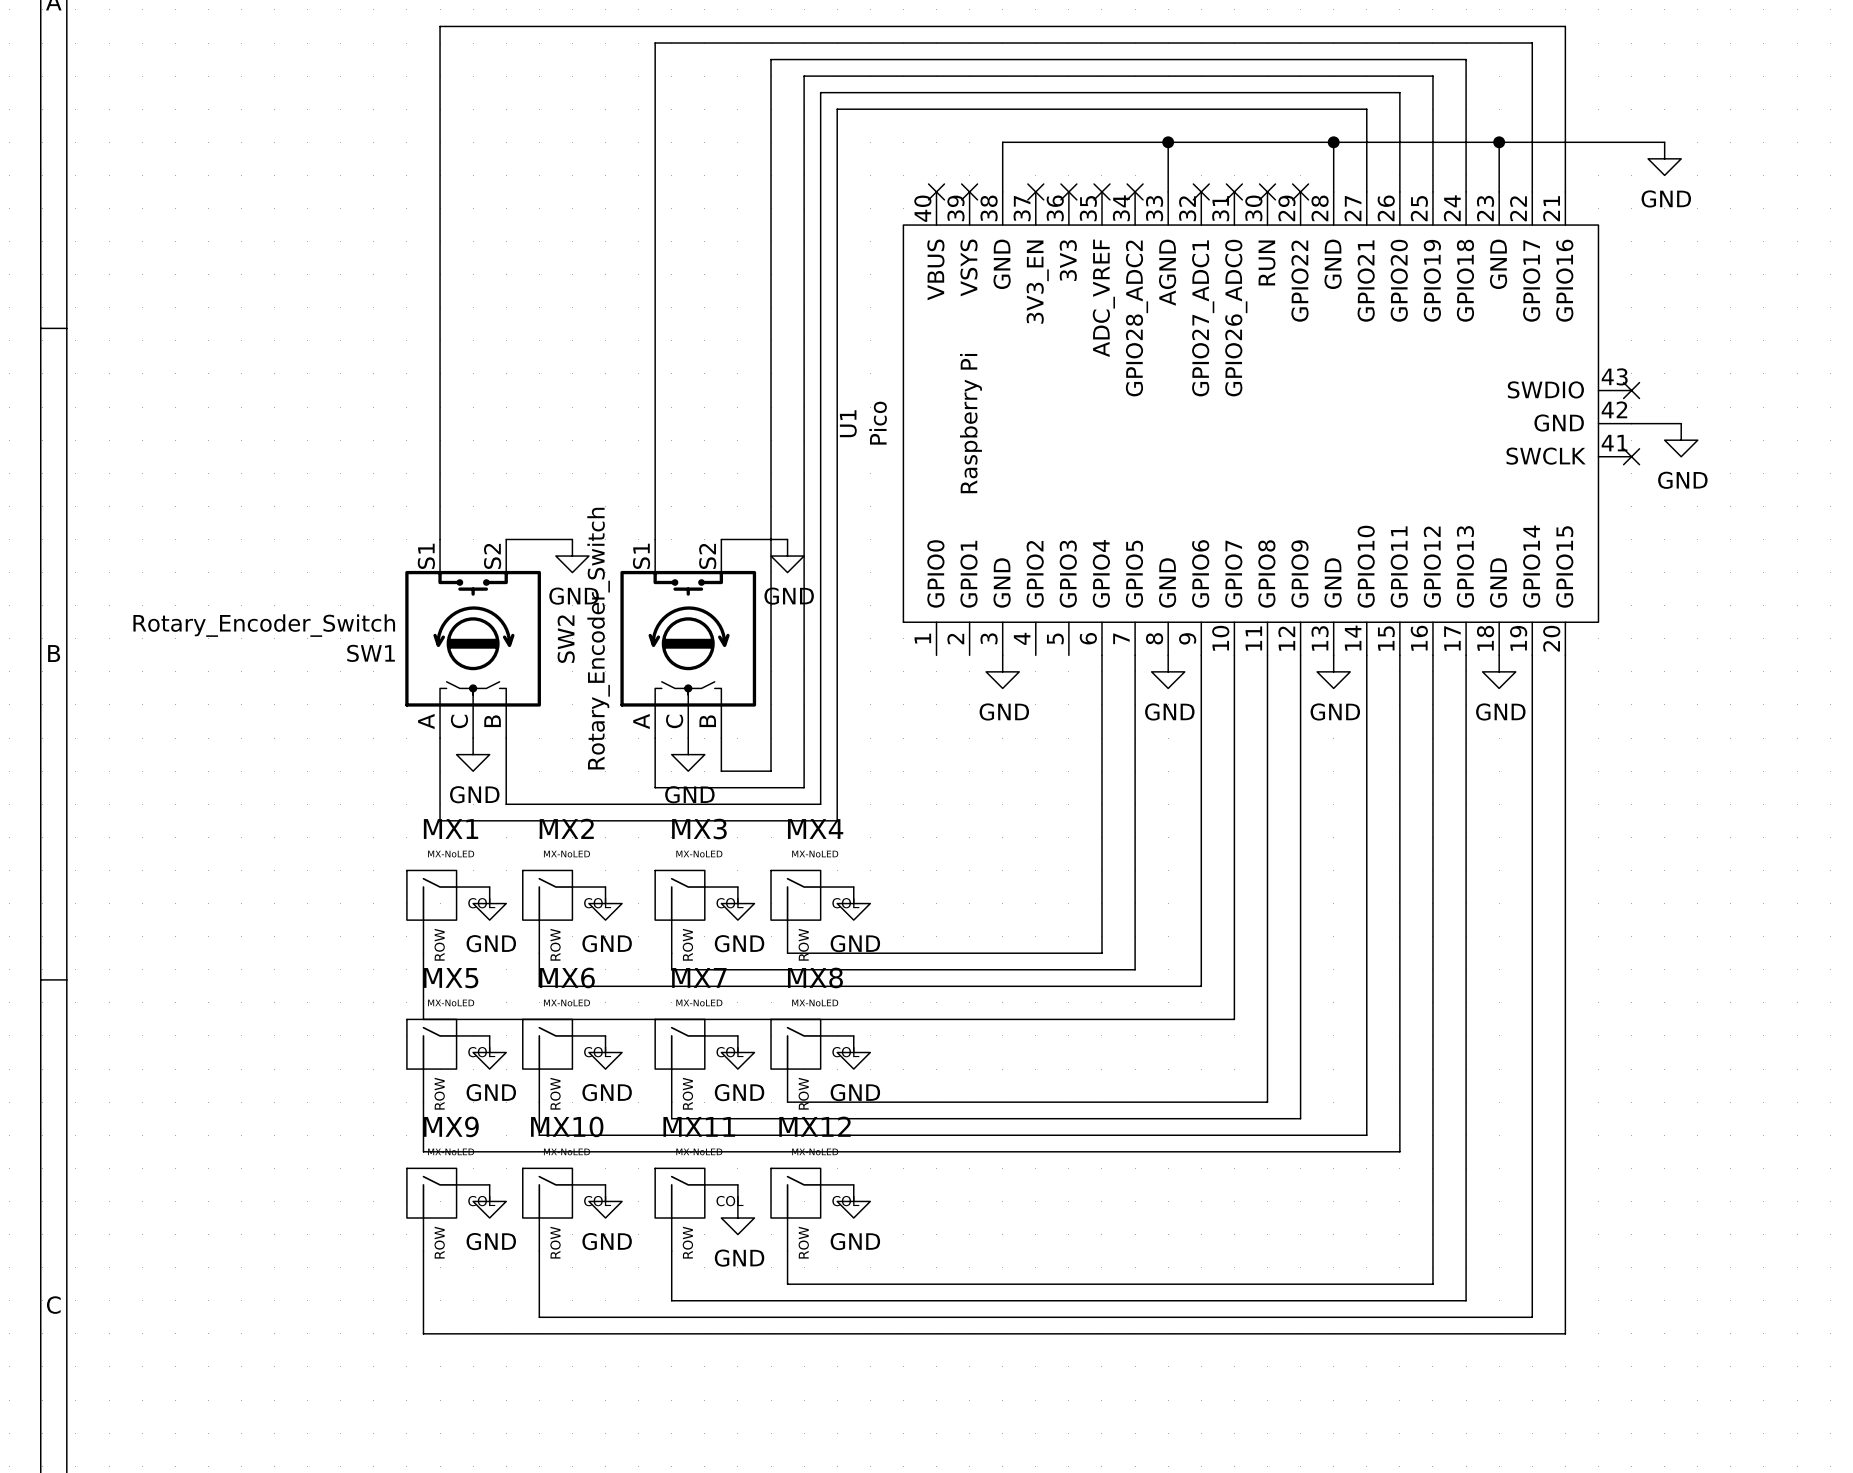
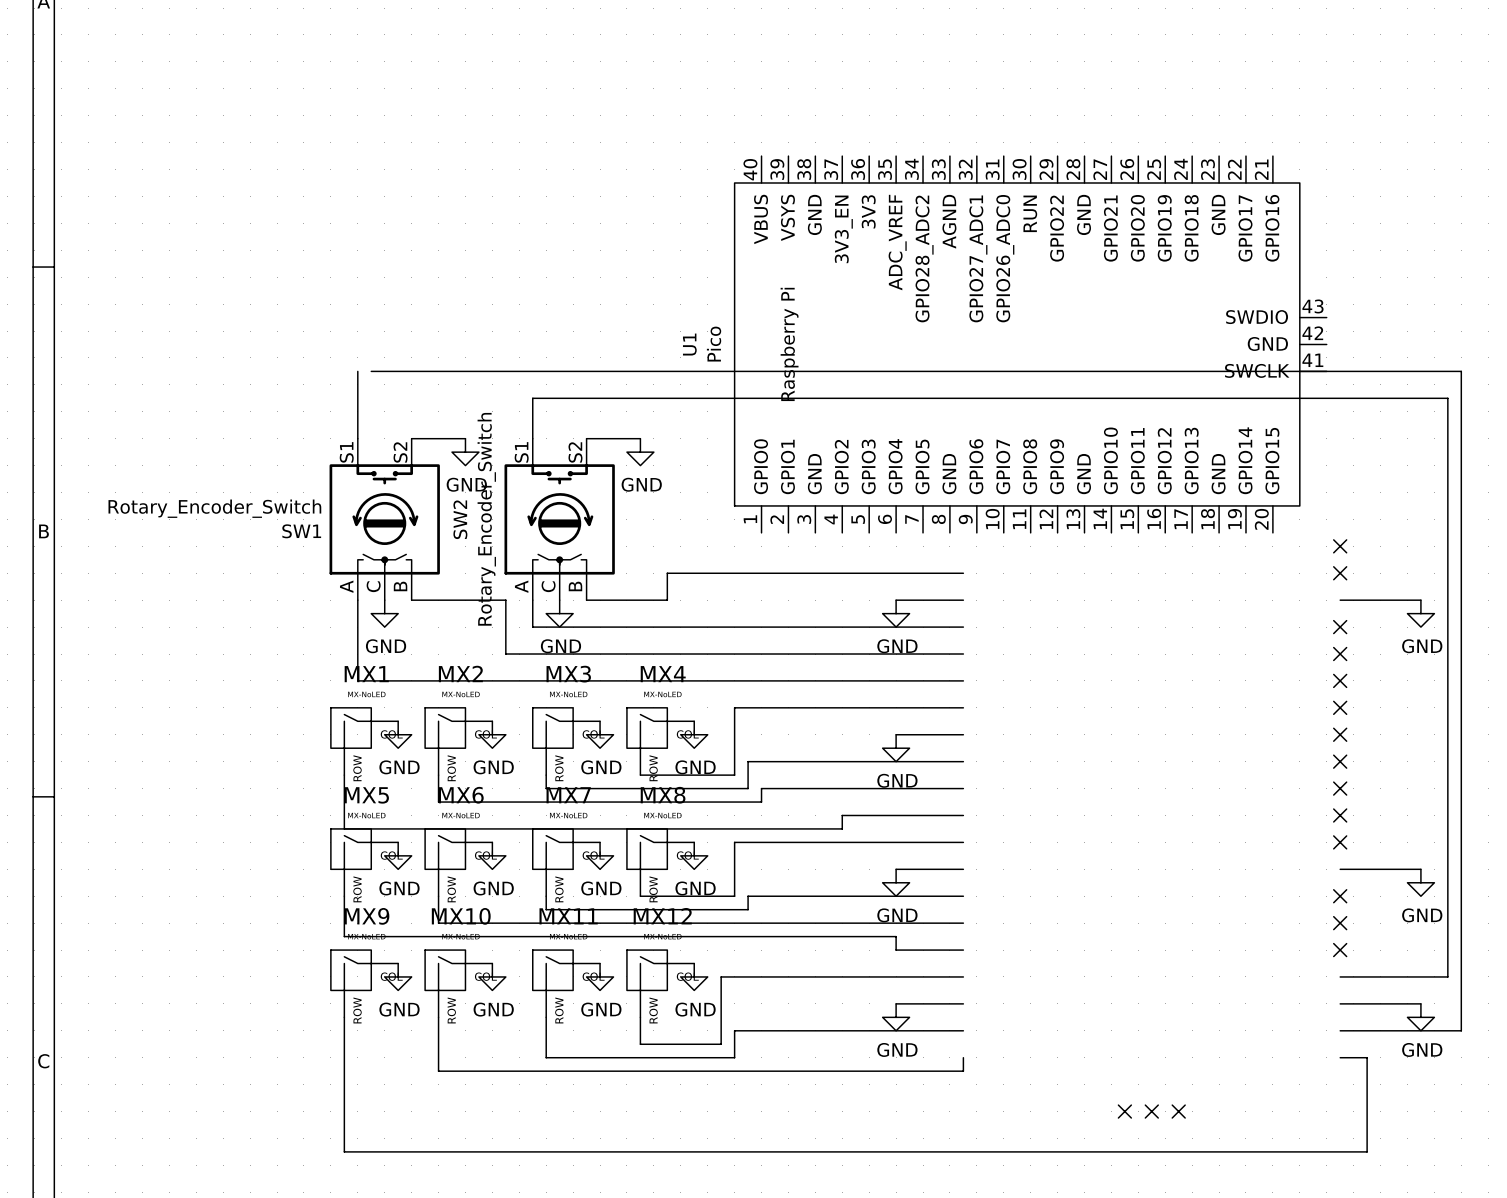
wire: (1168, 142) (1168, 191) -> none
junction: (1168, 142) -> none
wire: (1333, 142) (1333, 191) -> none
junction: (1333, 142) -> none
wire: (1499, 142) (1499, 191) -> none
junction: (1499, 142) -> none
wire: (1664, 142) (1002, 142) (1002, 191) -> none
power symbol: GND (1664, 158) -> none
no-connect mark: (936, 191) -> none
no-connect mark: (969, 191) -> none
no-connect mark: (1035, 191) -> none
no-connect mark: (1068, 191) -> none
no-connect mark: (1101, 191) -> none
no-connect mark: (1135, 191) -> none
no-connect mark: (1201, 191) -> none
no-connect mark: (1234, 191) -> none
no-connect mark: (1267, 191) -> none
no-connect mark: (1300, 191) -> none
wire: (1366, 191) (1366, 109) (837, 109) (837, 820) (440, 820) -> (963, 680) (357, 680) (357, 667)
wire: (1399, 191) (1399, 92) (820, 92) (820, 704) -> (963, 573) (667, 573)
wire: (1432, 191) (1432, 76) (804, 76) (804, 787) (655, 787) (655, 771) -> none
wire: (1466, 191) (1466, 59) (771, 59) (771, 771) -> (963, 627) (626, 627)
wire: (1532, 191) (1532, 43) (655, 43) (655, 489) -> (1340, 976) (1447, 976) (1447, 398) (532, 398)
wire: (1565, 191) (1565, 26) (440, 26) (440, 456) -> none
no-connect mark: (1631, 390) -> none
wire: (1631, 423) (1681, 423) -> none
power symbol: GND (1681, 440) -> none
wire: none -> (371, 371) (1461, 371) (1461, 1030) (1340, 1030)
no-connect mark: (1631, 456) -> none
wire: (1101, 655) (1101, 953) (903, 953) -> (963, 707) (734, 707) (734, 775)
wire: (1135, 655) (1135, 969) -> (963, 788) (923, 788)
wire: (1201, 655) (1201, 986) (936, 986) -> none
wire: (1234, 655) (1234, 1019) (1035, 1019) -> (963, 815) (842, 815) (842, 828)
wire: (1267, 655) (1267, 1102) (1184, 1102) -> none
wire: (1300, 655) (1300, 1118) (919, 1118) -> none
wire: (1366, 655) (1366, 1135) (1184, 1135) -> none
wire: (1399, 655) (1399, 1151) (1101, 1151) -> (963, 950) (896, 950) (896, 936)
wire: (1432, 655) (1432, 1284) (886, 1284) -> (963, 976) (721, 976) (721, 1044)
wire: (1466, 655) (1466, 1300) (903, 1300) -> (963, 1030) (734, 1030) (734, 1057)
wire: (1532, 655) (1532, 1317) (1184, 1317) -> (963, 1057) (963, 1071)
wire: (1565, 655) (1565, 1333) (423, 1333) -> (1340, 1057) (1367, 1057) (1367, 1151) (344, 1151) (344, 1084)
power symbol: GND (1002, 671) -> none
power symbol: GND (1168, 671) -> none
power symbol: GND (1333, 671) -> none
power symbol: GND (1499, 671) -> none
no-connect mark: none -> (1340, 546)
no-connect mark: none -> (1340, 573)
wire: (506, 738) (506, 804) (622, 804) -> (411, 600) (505, 600) (505, 654)
wire: (721, 738) (721, 771) -> (532, 627) (586, 627)
wire: (820, 738) (820, 804) -> (667, 600) (586, 600)
wire: none -> (896, 600) (963, 600)
wire: none -> (1340, 600) (1420, 600)
power symbol: none -> GND (896, 613)
power symbol: none -> GND (1420, 613)
no-connect mark: none -> (1340, 627)
wire: none -> (667, 654) (963, 654)
no-connect mark: none -> (1340, 654)
no-connect mark: none -> (1340, 680)
no-connect mark: none -> (1340, 707)
wire: none -> (896, 734) (963, 734)
no-connect mark: none -> (1340, 734)
power symbol: none -> GND (896, 748)
wire: none -> (963, 761) (748, 761) (748, 788)
no-connect mark: none -> (1340, 761)
wire: (919, 969) (936, 969) -> (761, 802) (761, 788)
no-connect mark: none -> (1340, 788)
no-connect mark: none -> (1340, 815)
wire: none -> (963, 842) (734, 842) (734, 896)
no-connect mark: none -> (1340, 842)
wire: none -> (896, 869) (963, 869)
wire: none -> (1340, 869) (1420, 869)
power symbol: none -> GND (896, 882)
power symbol: none -> GND (1420, 882)
wire: (903, 1102) (919, 1102) -> (748, 909) (748, 896)
no-connect mark: none -> (1340, 896)
no-connect mark: none -> (1340, 923)
no-connect mark: none -> (1340, 950)
power symbol position: GND (737, 1218) -> GND (600, 976)
wire: none -> (896, 1003) (963, 1003)
wire: none -> (1340, 1003) (1420, 1003)
power symbol: none -> GND (896, 1017)
power symbol: none -> GND (1420, 1017)
no-connect mark: none -> (1124, 1111)
no-connect mark: none -> (1151, 1111)
no-connect mark: none -> (1178, 1111)

